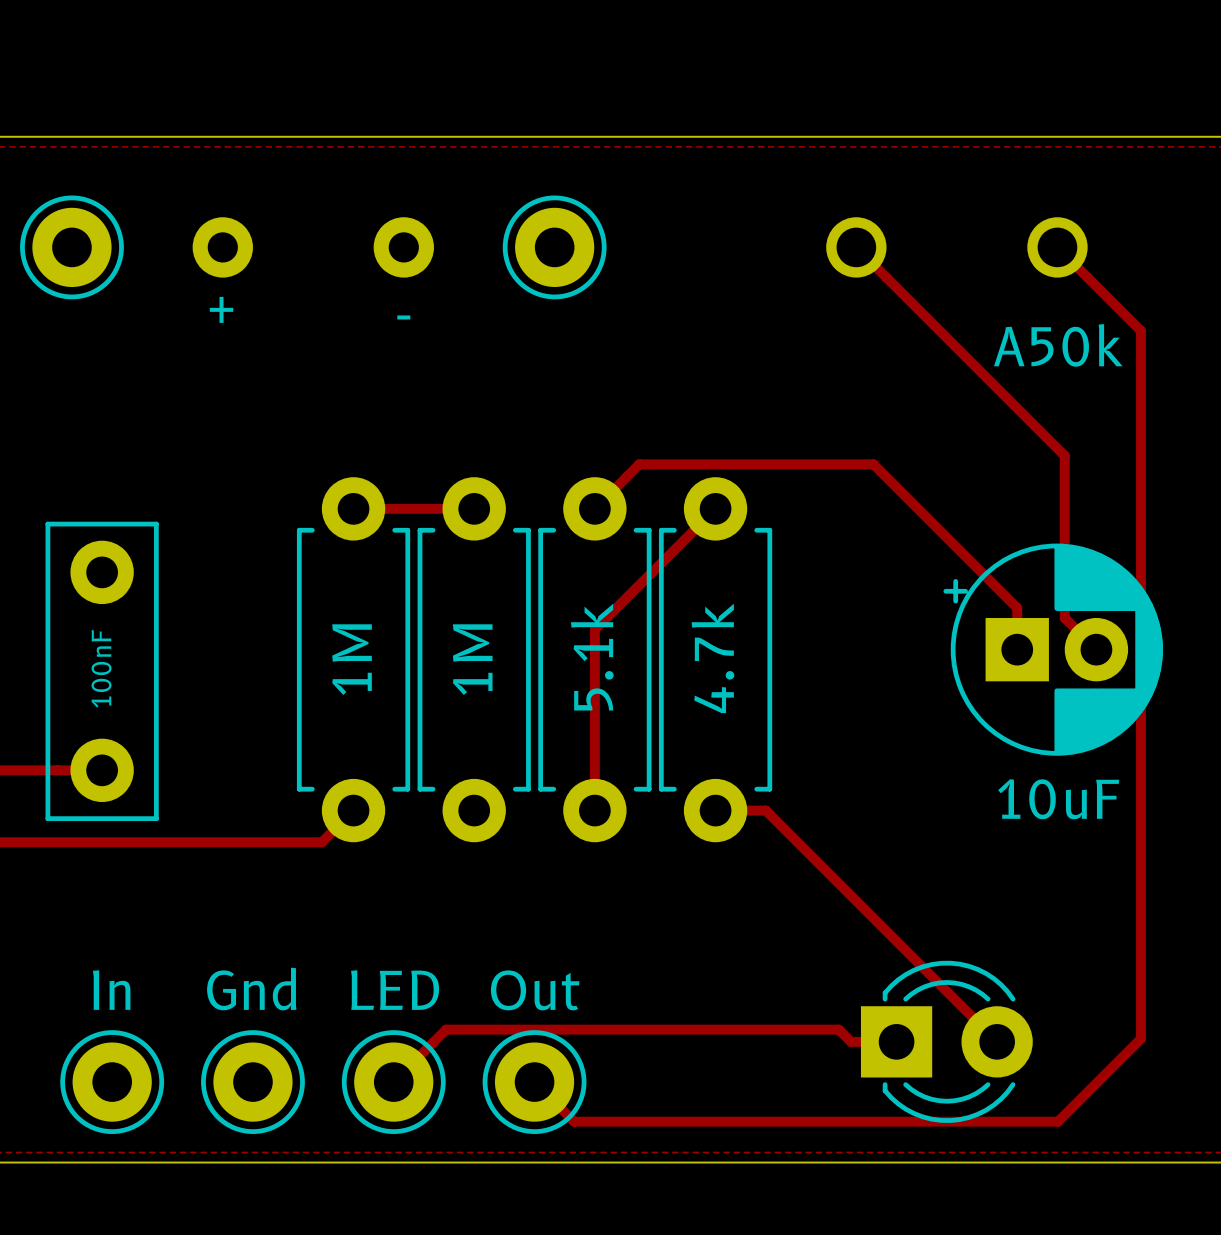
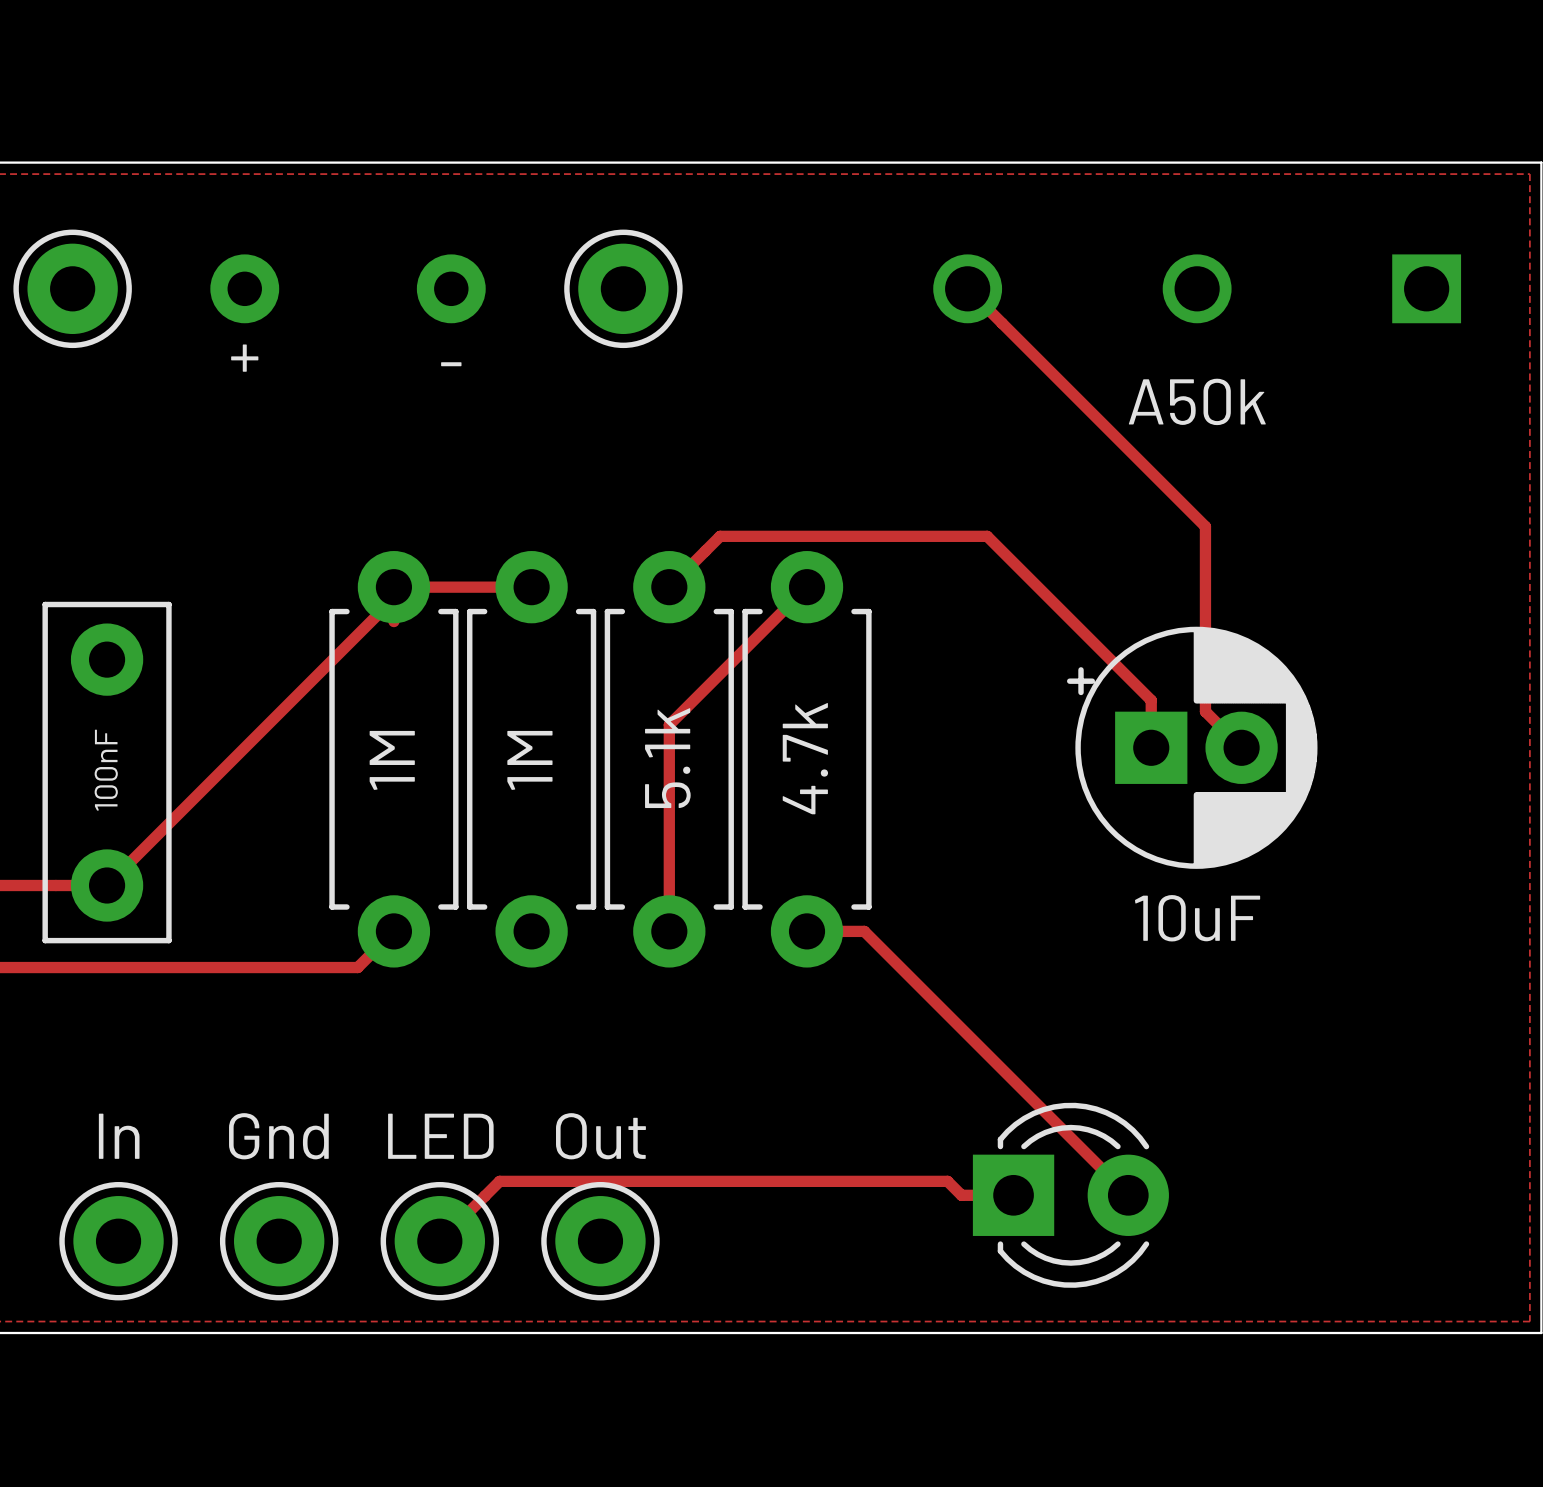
track: (1057, 247) (1140, 330) (1140, 1038) (1058, 1121) (574, 1121) (534, 1082) -> none
track: none -> (393, 621) (393, 598) (107, 885)

